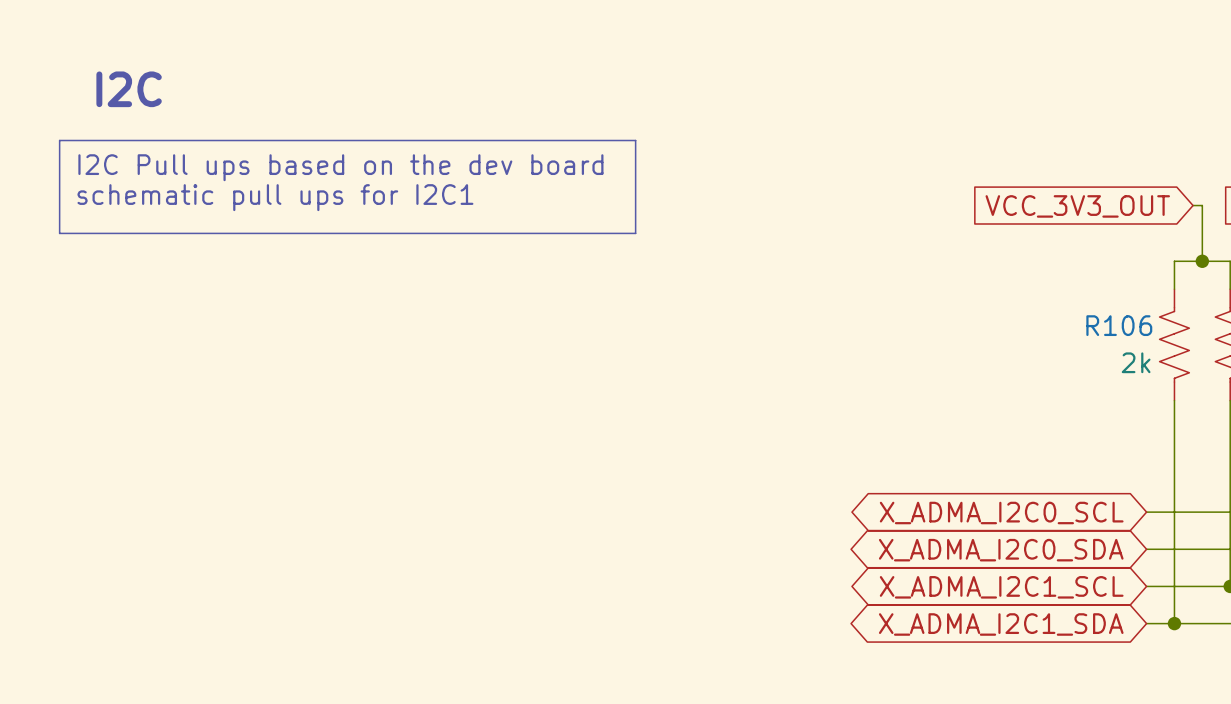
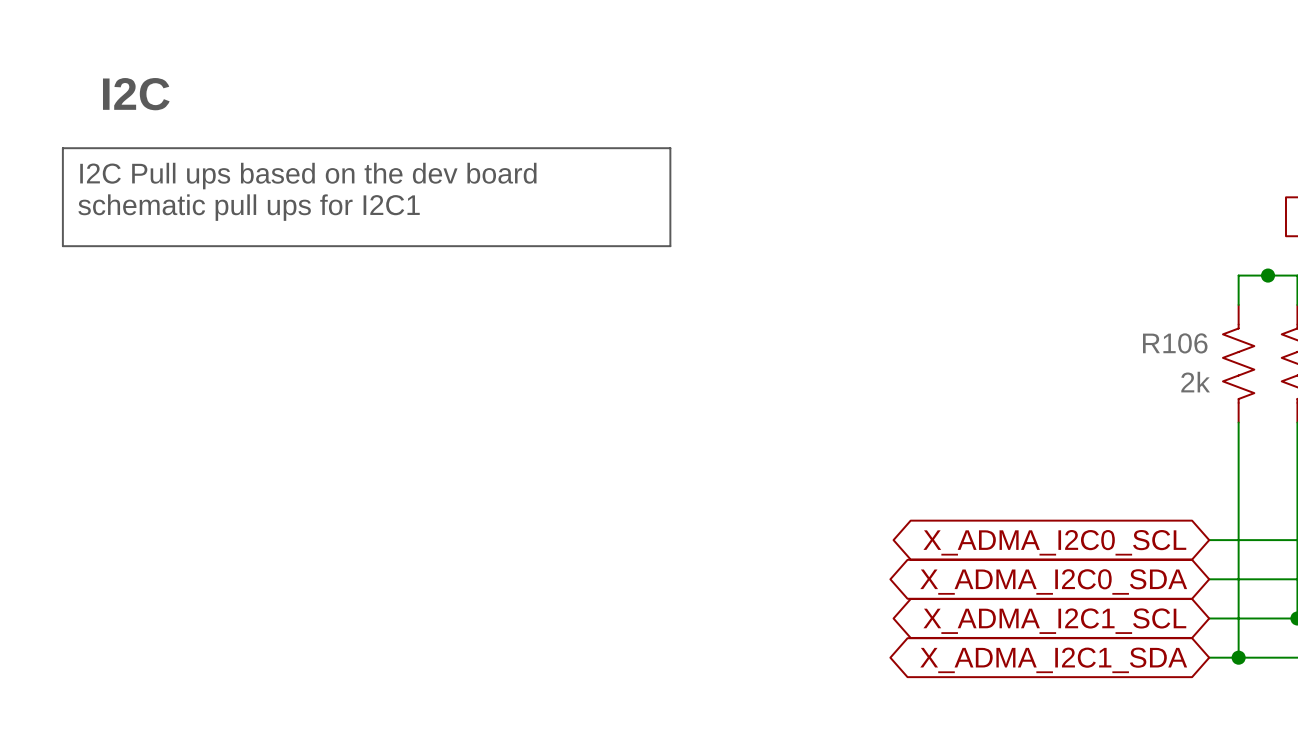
wire: (1193, 205) (1202, 205) (1202, 261) -> none
global label: VCC_3V3_OUT (1077, 206) -> none

